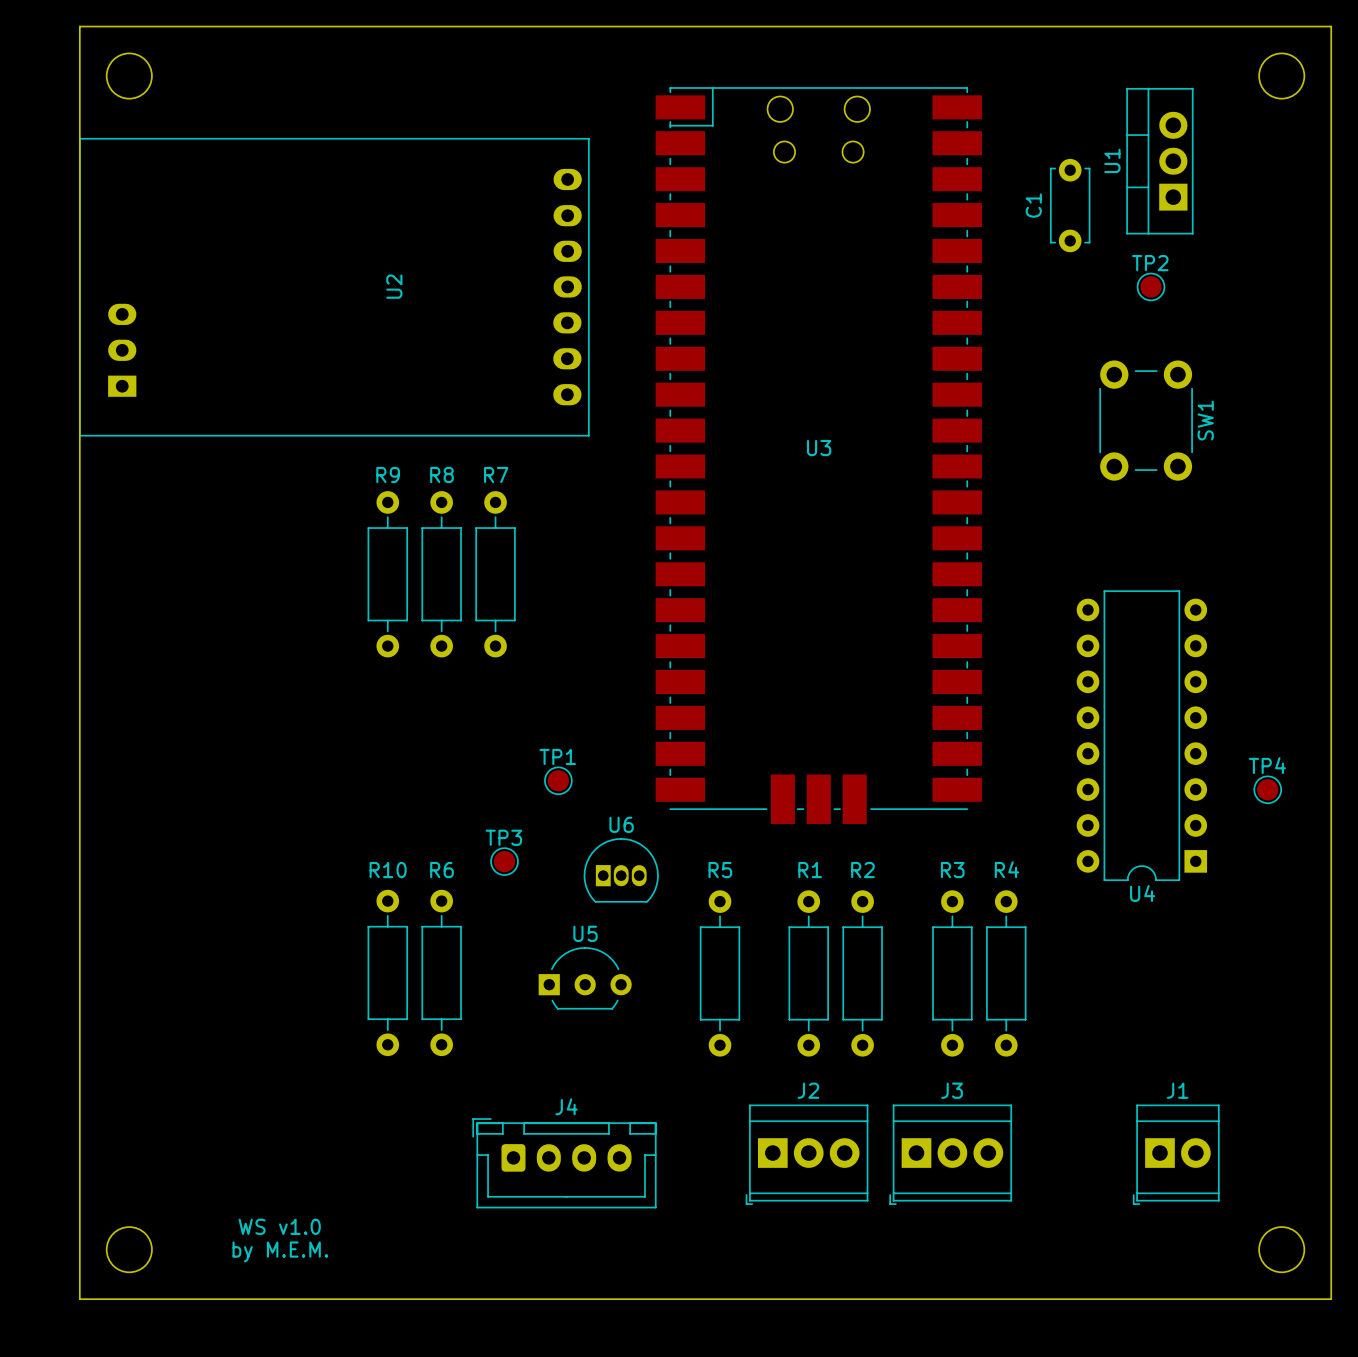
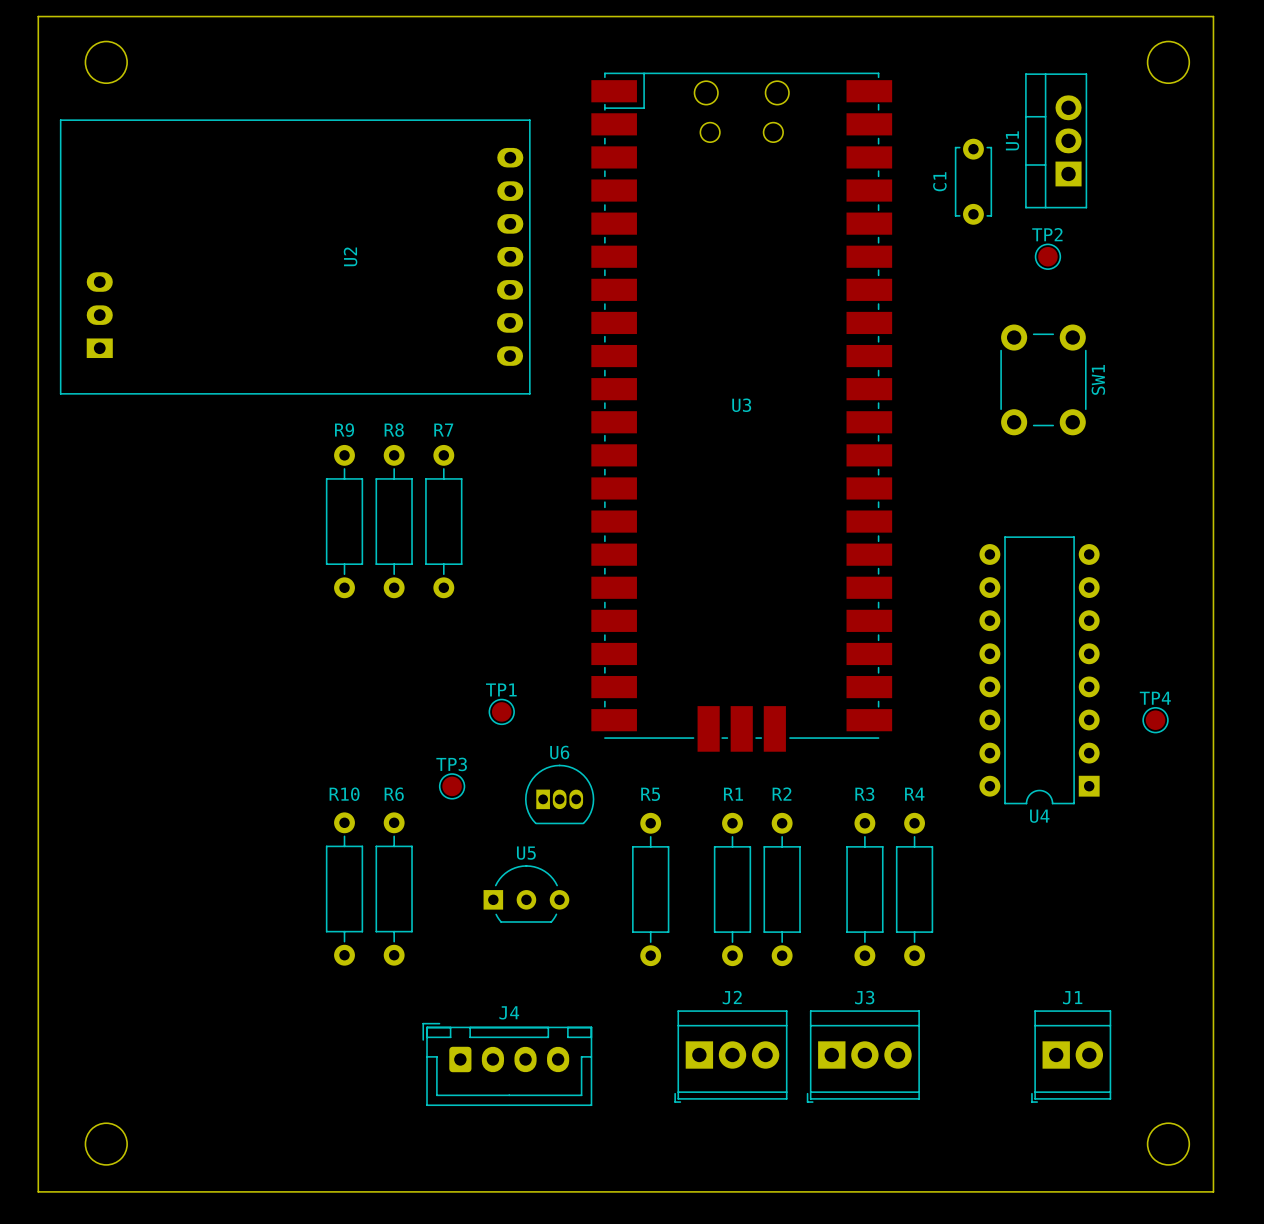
board edge: (79, 26) (1331, 26) (1331, 1299) (79, 1299) (79, 26) -> (38, 16) (38, 1191) (1213, 1191) (1213, 16) (38, 16)
text: WS v1.0 (279, 1226) -> none
text: by M.E.M. (280, 1251) -> none

